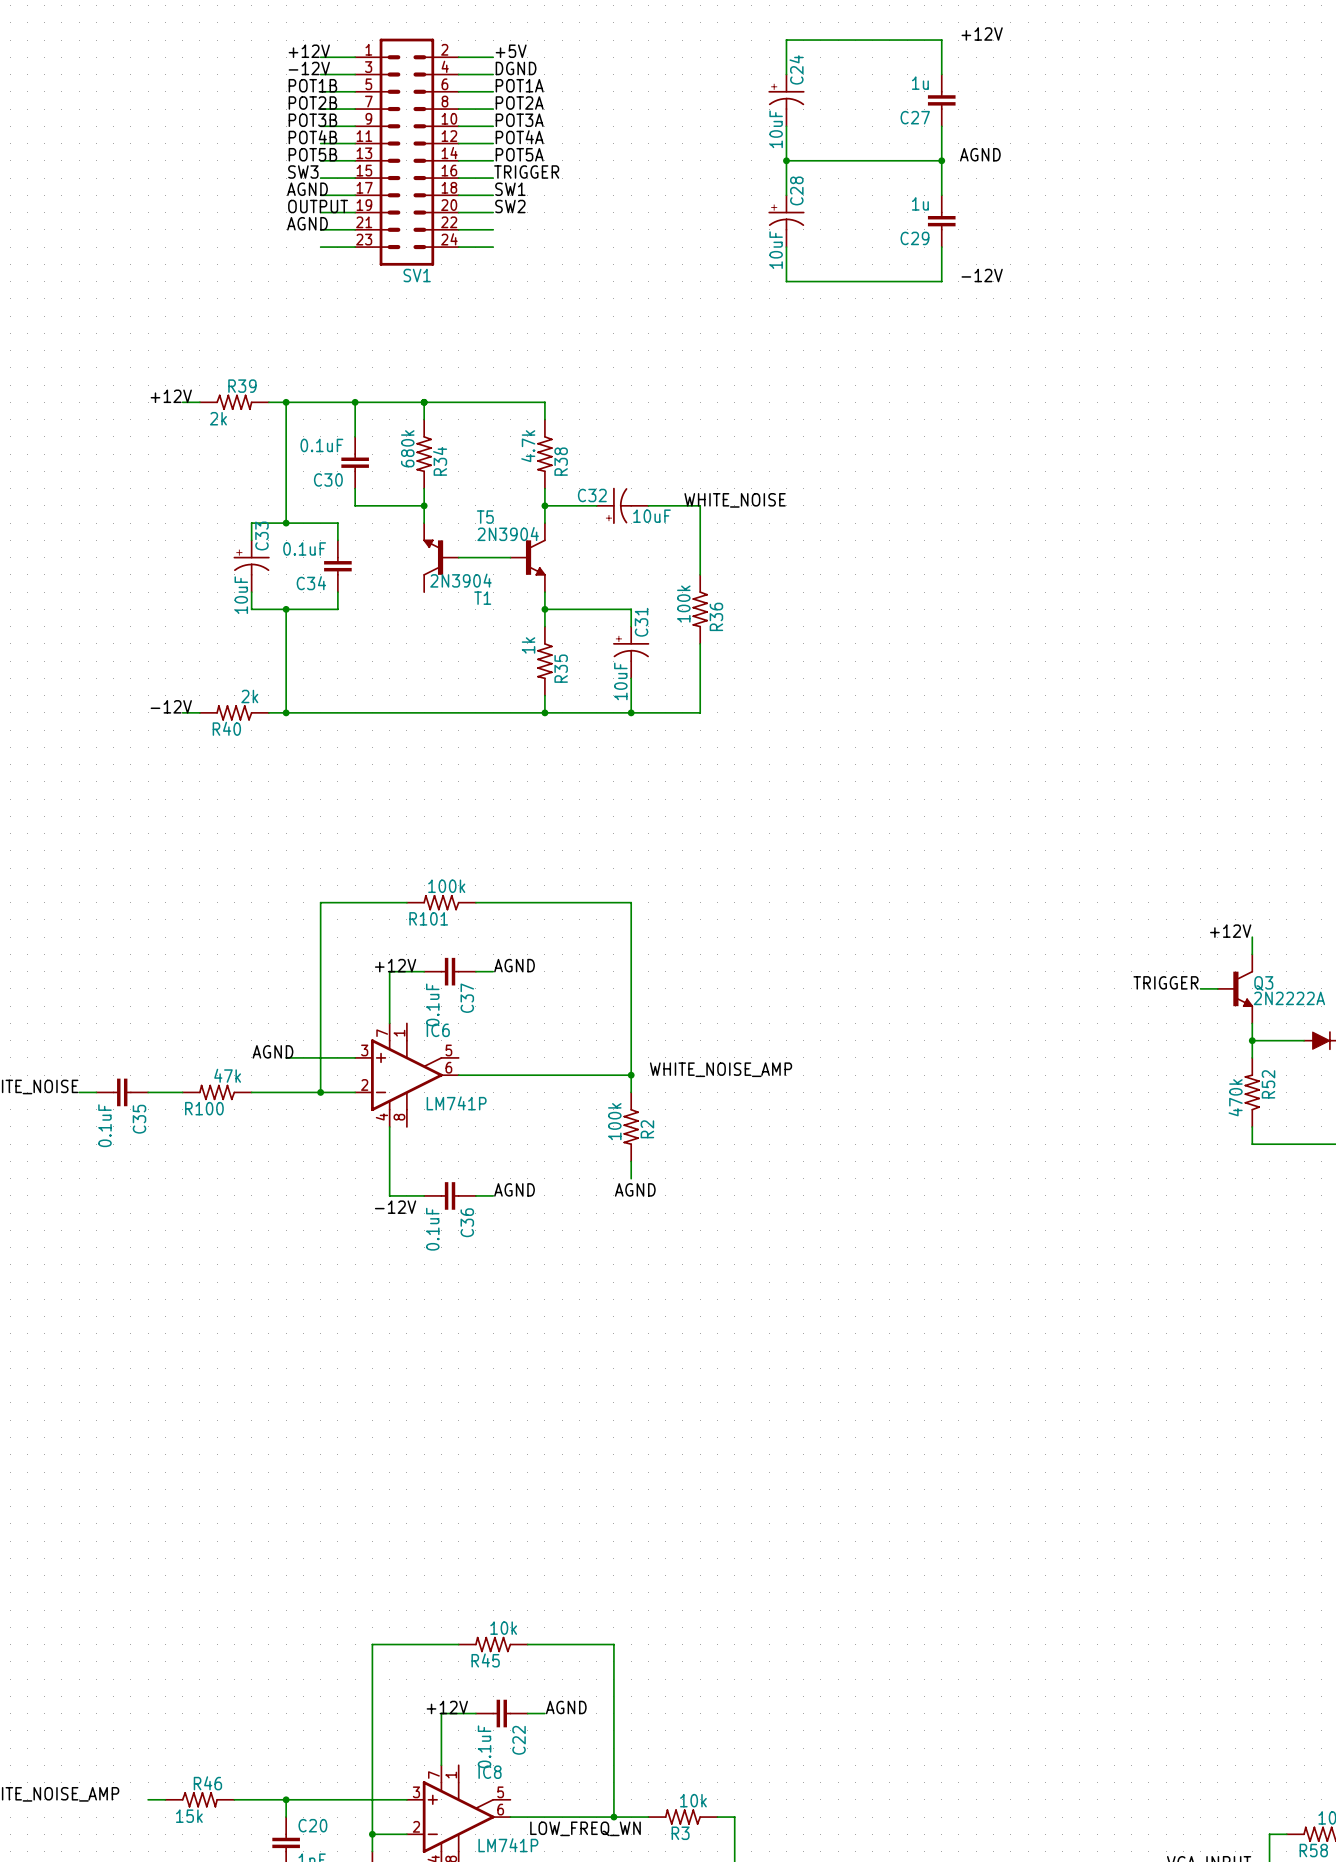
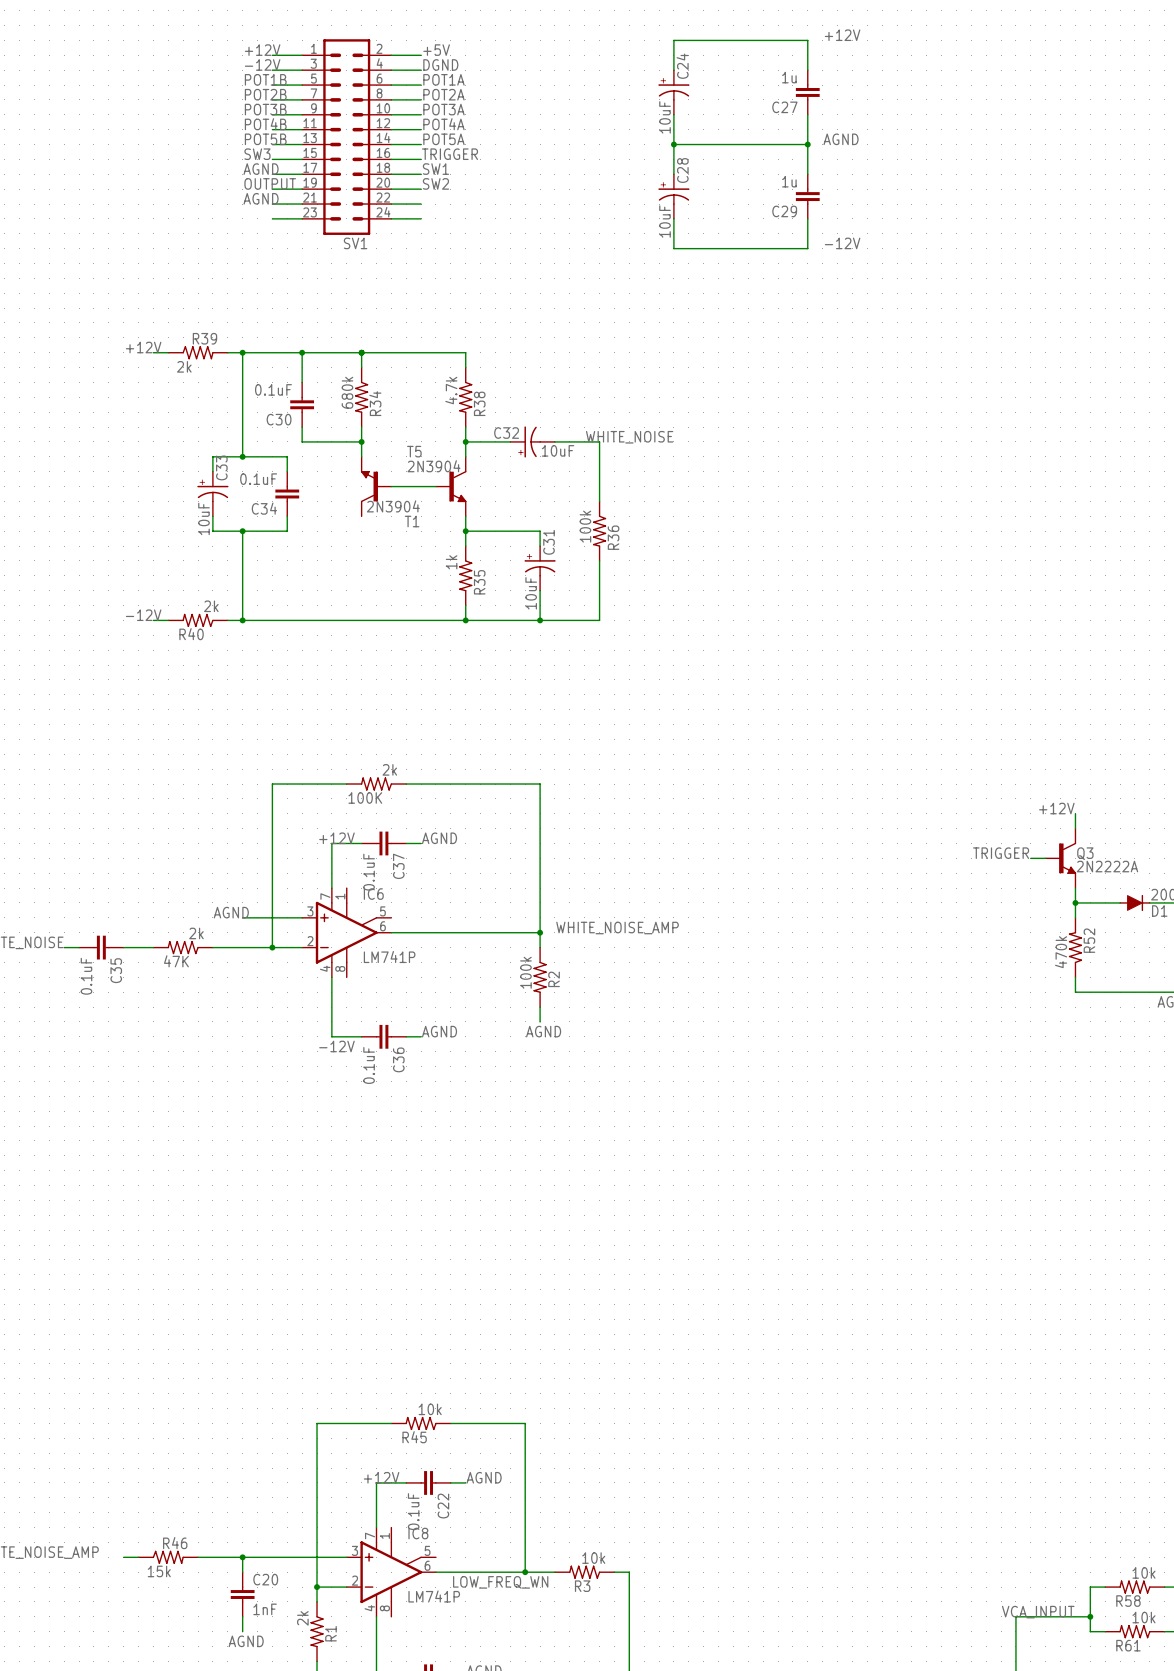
R101 value: 100k (446, 886) -> 2k (389, 769)
R101 name: R101 (428, 918) -> 100K (365, 797)
R100 value: 47k (227, 1075) -> 2k (196, 933)
R100 name: R100 (204, 1108) -> 47K (176, 961)

